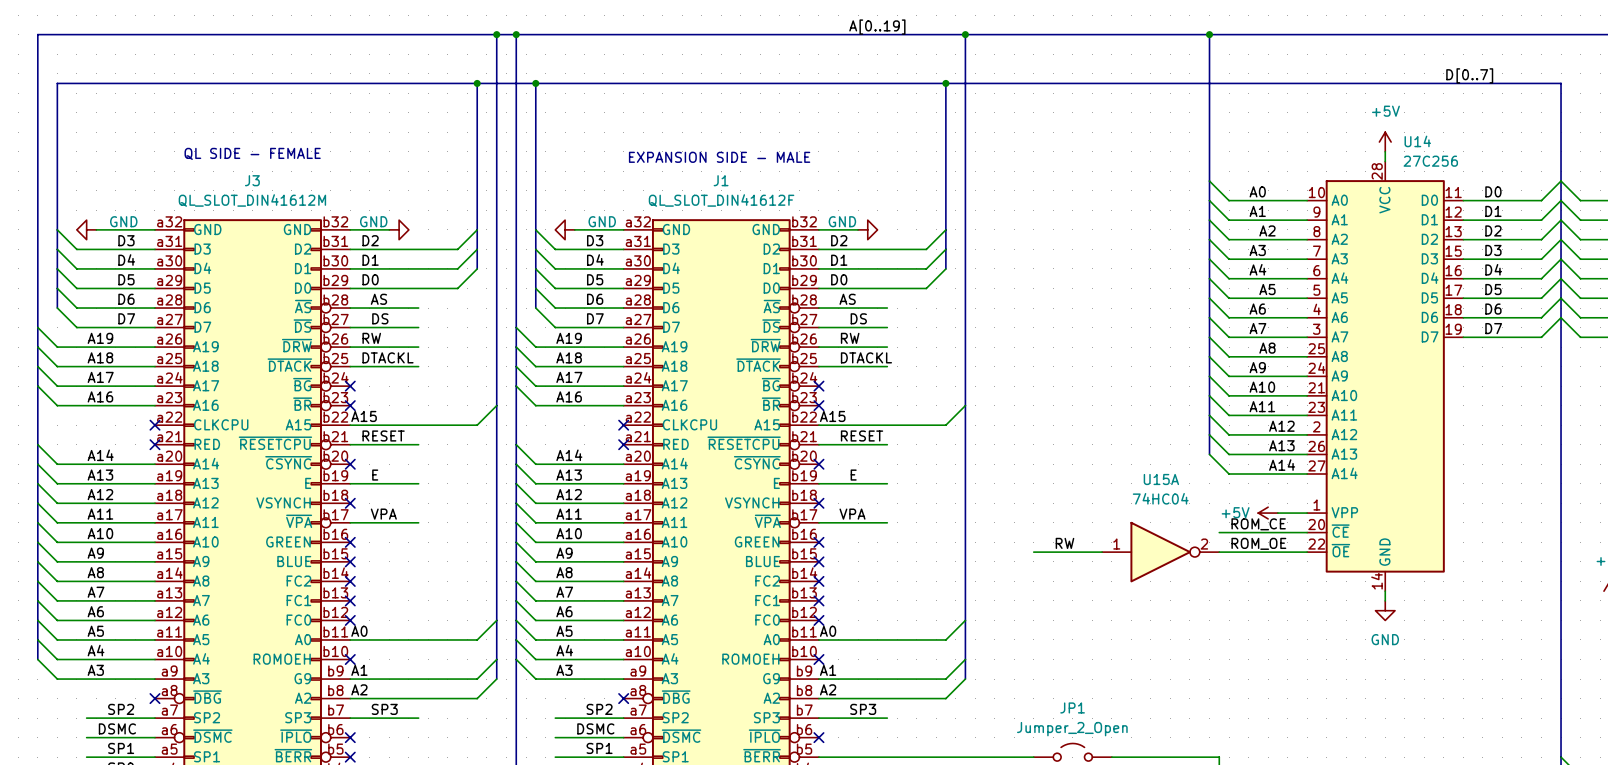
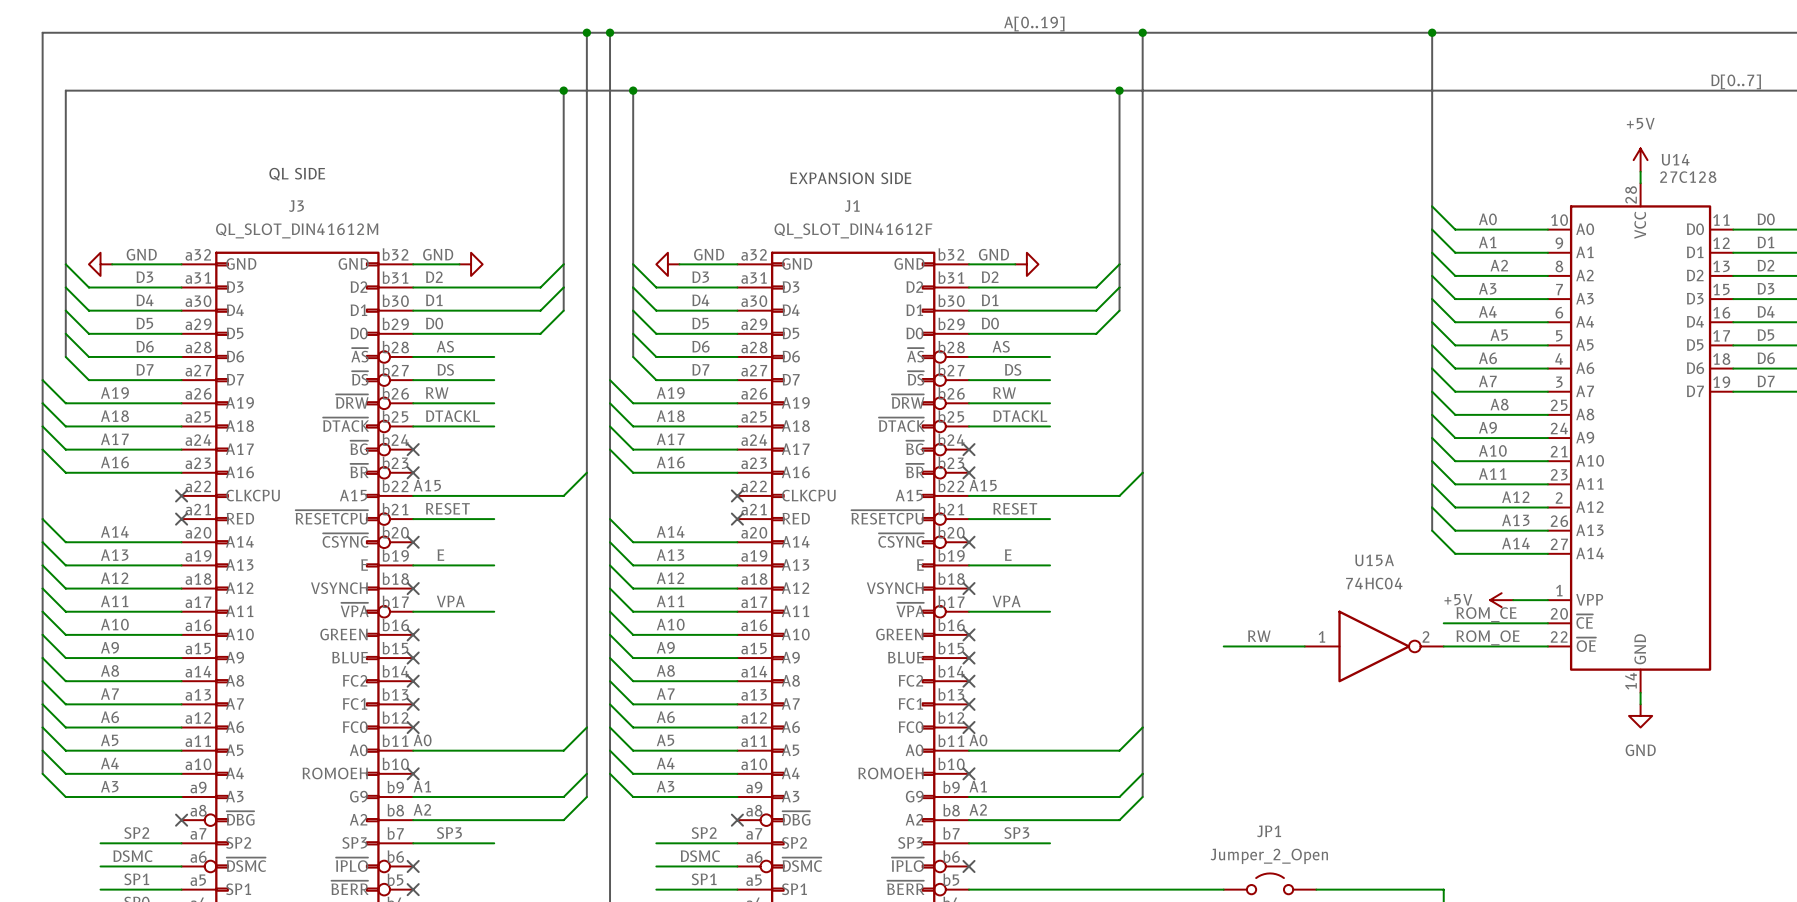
text: QL SIDE - FEMALE (252, 153) -> QL SIDE (297, 174)
text: EXPANSION SIDE - MALE (719, 157) -> EXPANSION SIDE (850, 178)
U14 value: 27C256 (1430, 161) -> 27C128 (1688, 177)

